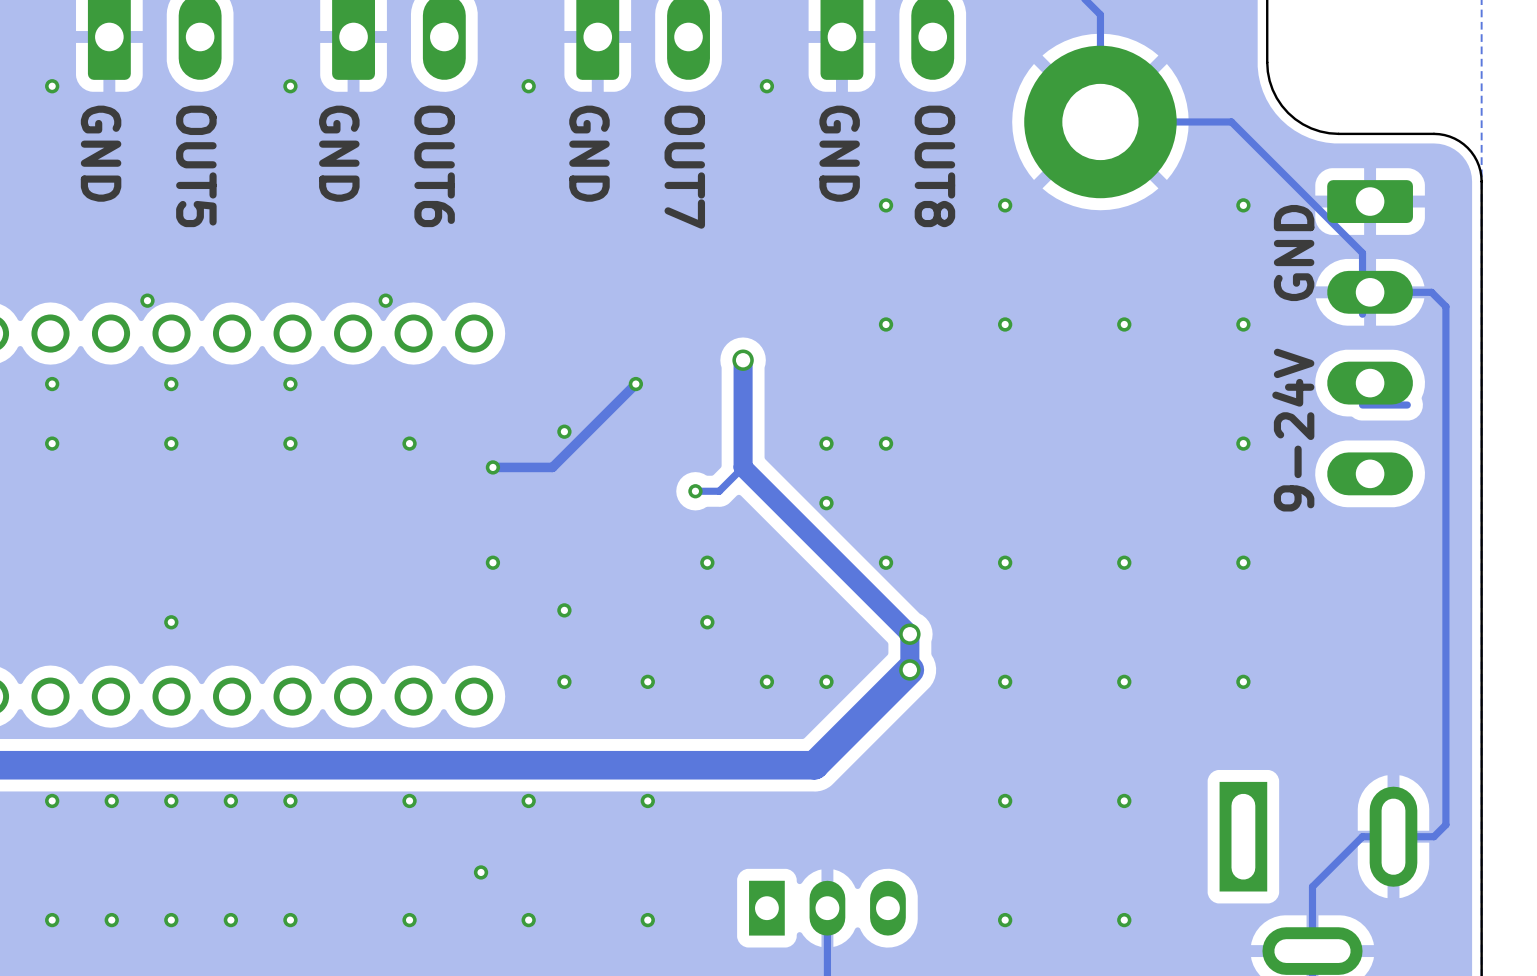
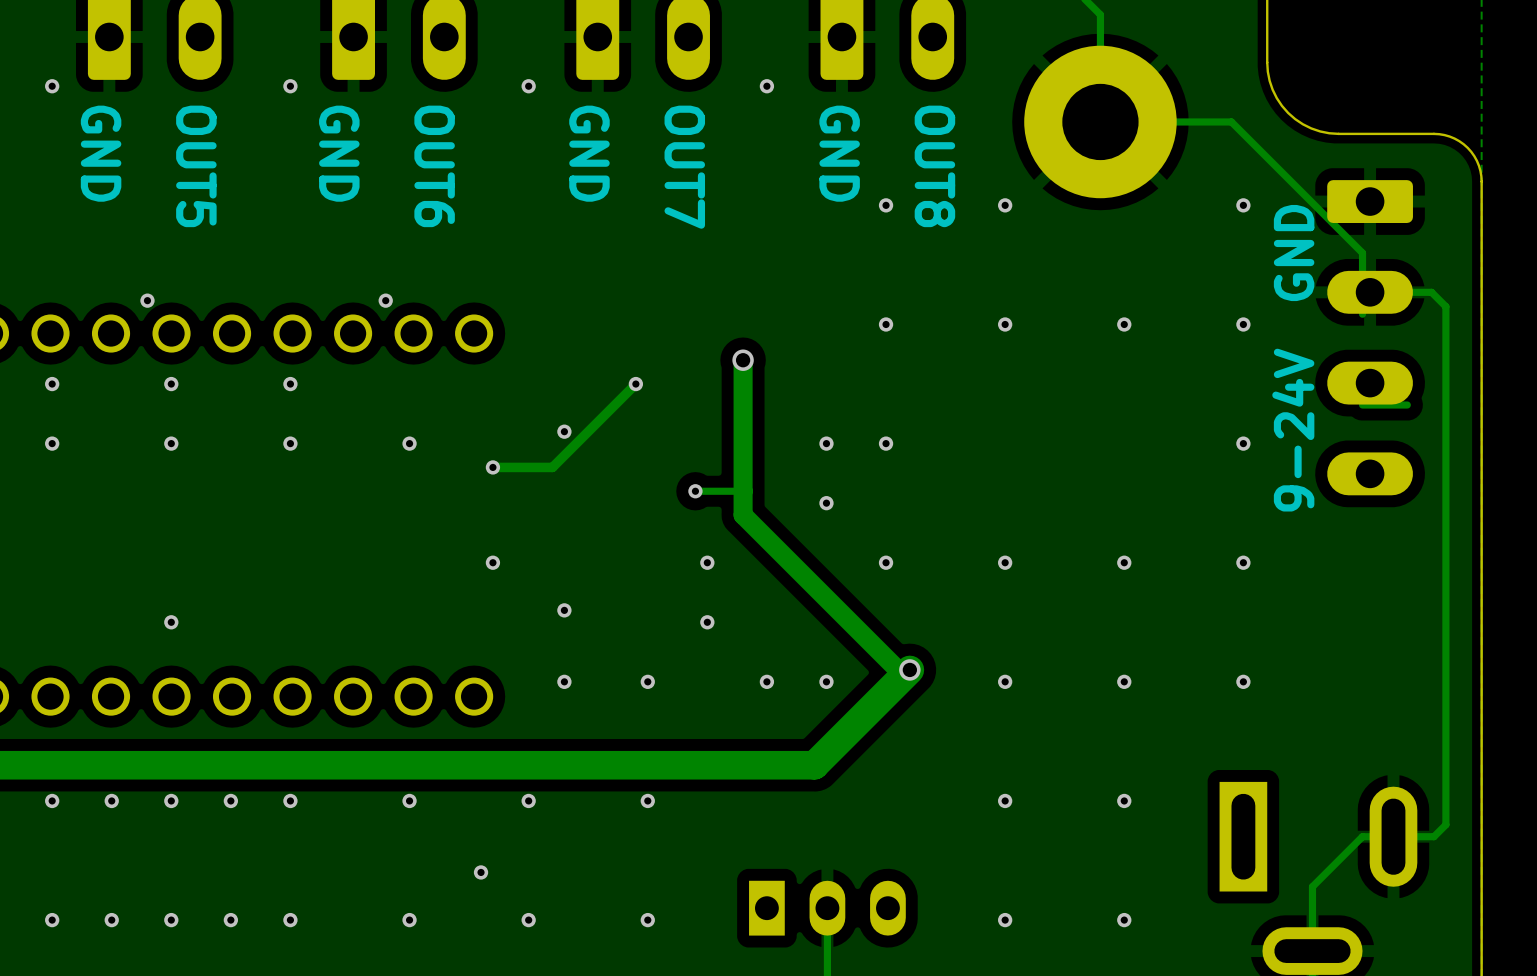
track: (719, 491) (743, 467) (909, 634) (909, 669) -> (743, 467) (743, 515) (897, 669) (909, 669)
track: none -> (743, 491) (719, 491)
via: (909, 634) -> none

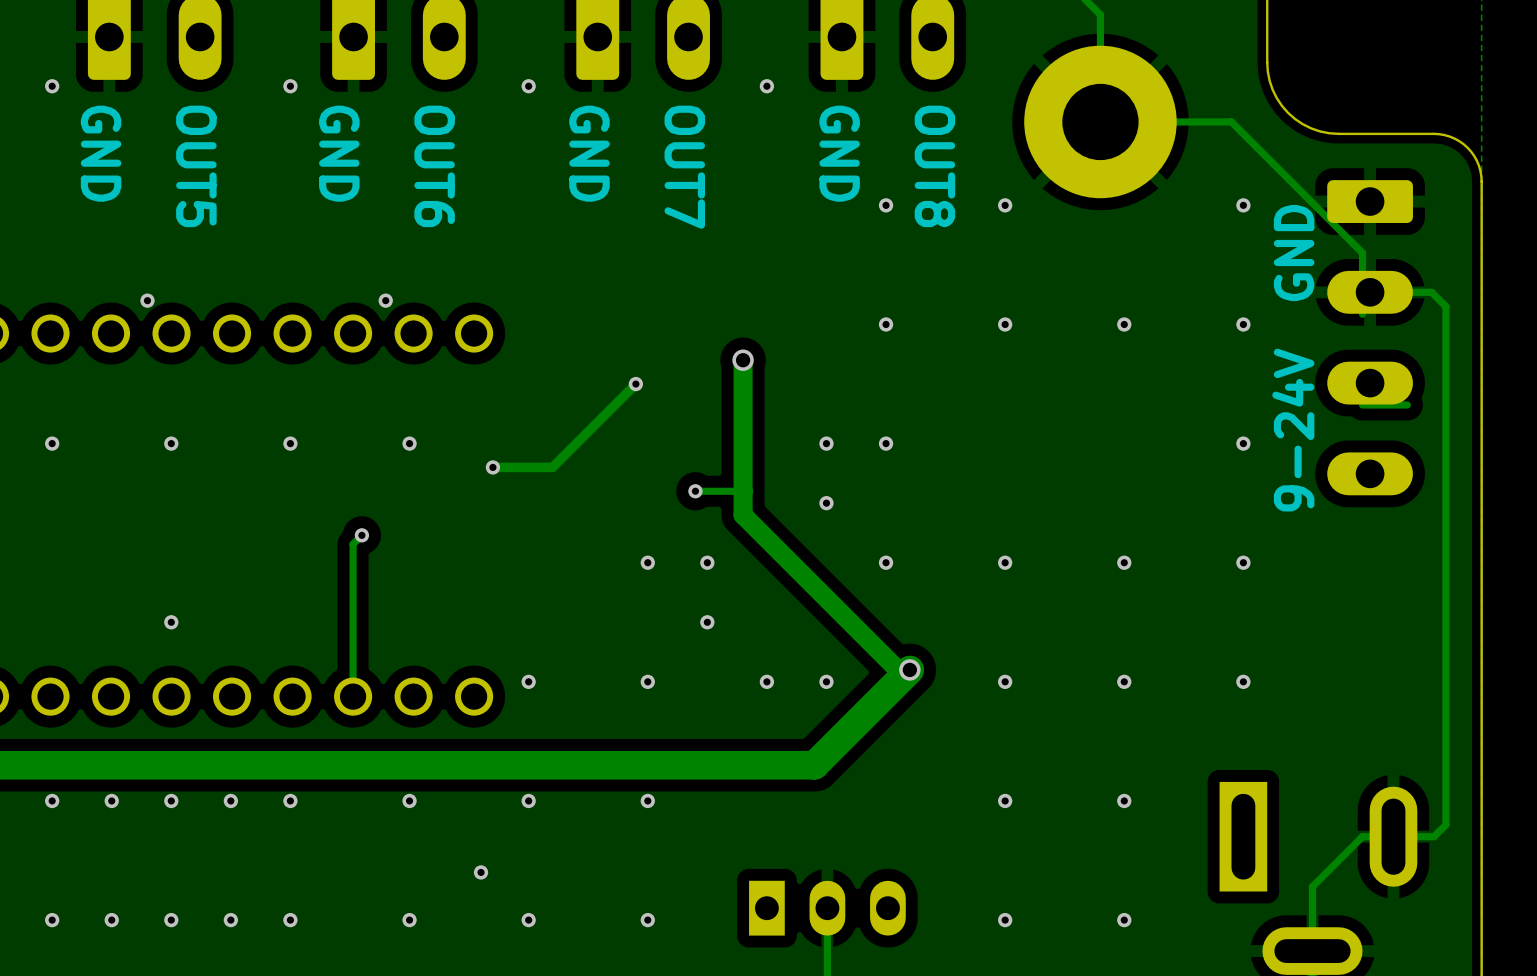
via: (52, 384) -> none
via: (171, 384) -> none
via: (290, 384) -> none
via: (564, 431) -> none
track: none -> (361, 535) (353, 544) (353, 696)
via: none -> (361, 535)
via: (492, 562) -> none
via: none -> (647, 562)
via: (564, 610) -> none
via position: (564, 681) -> (528, 681)

